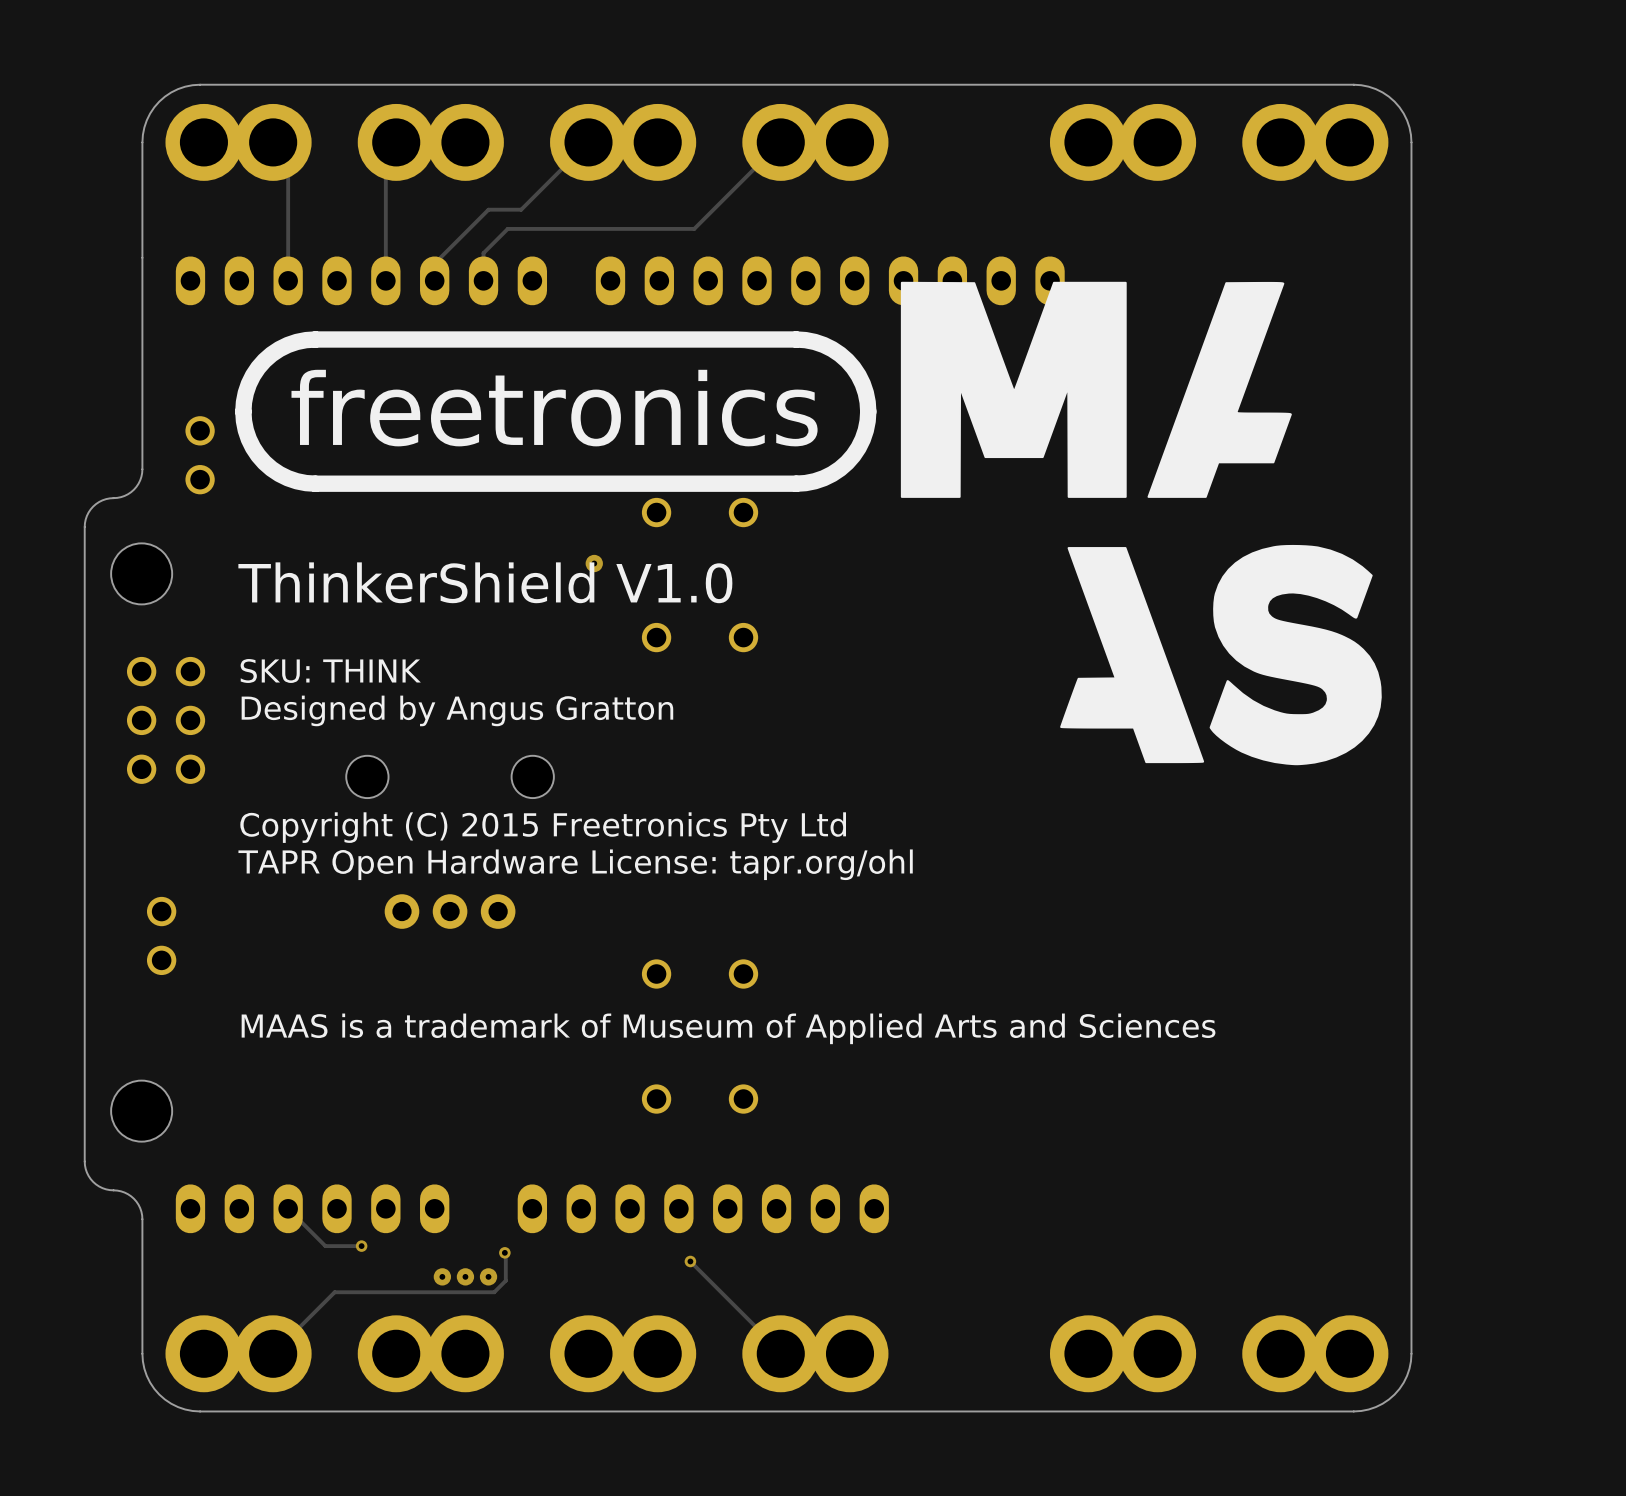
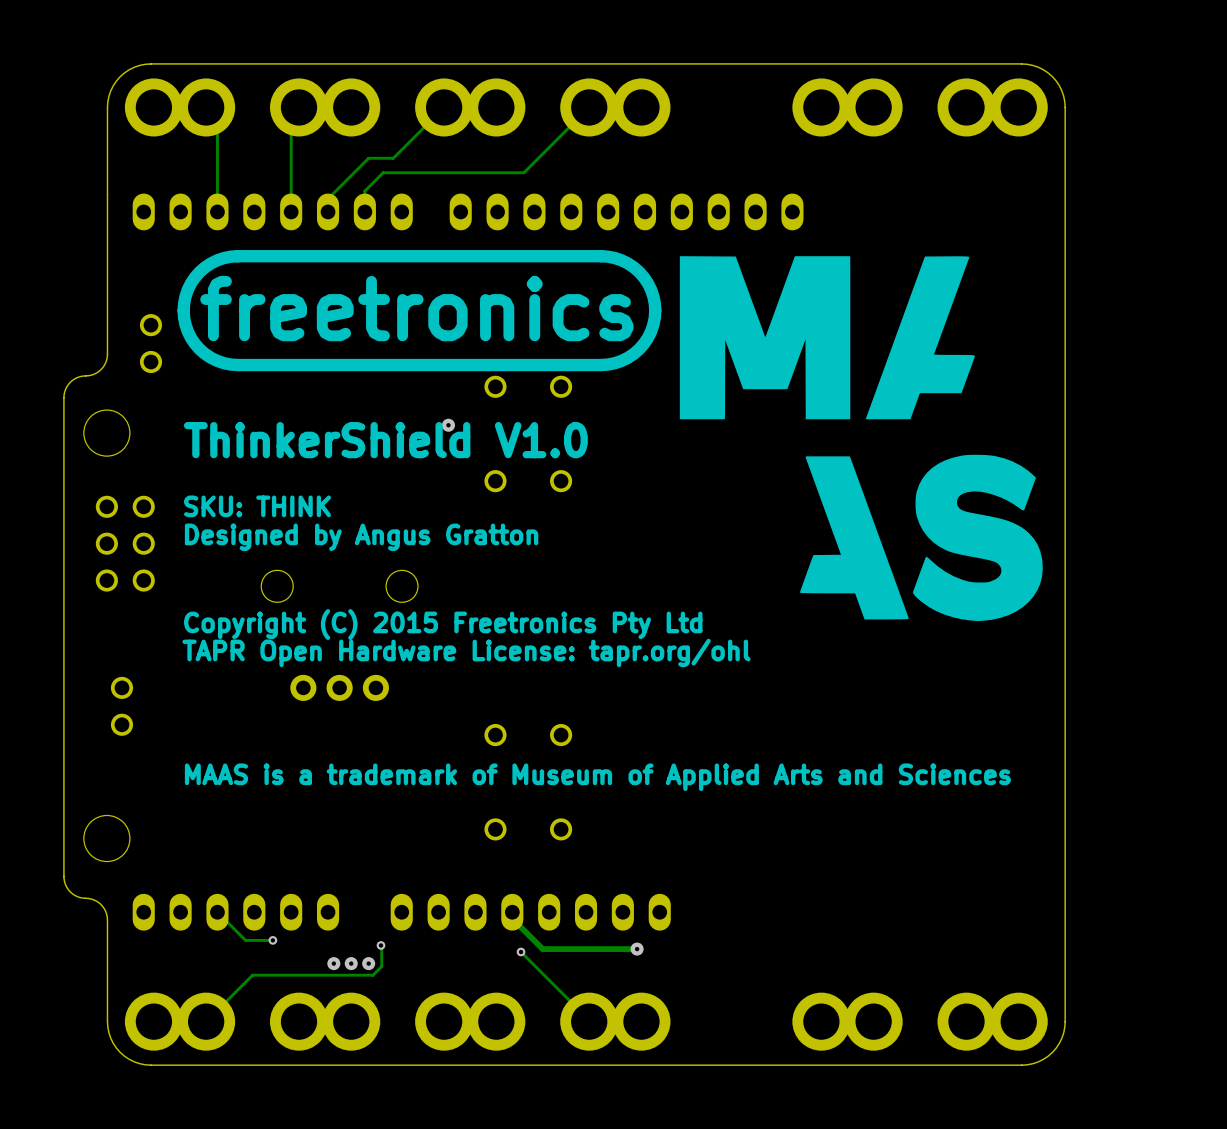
drawing position: (1141, 523) -> (861, 438)
track: none -> (512, 912) (512, 918) (542, 949) (637, 949)
via: none -> (637, 949)

